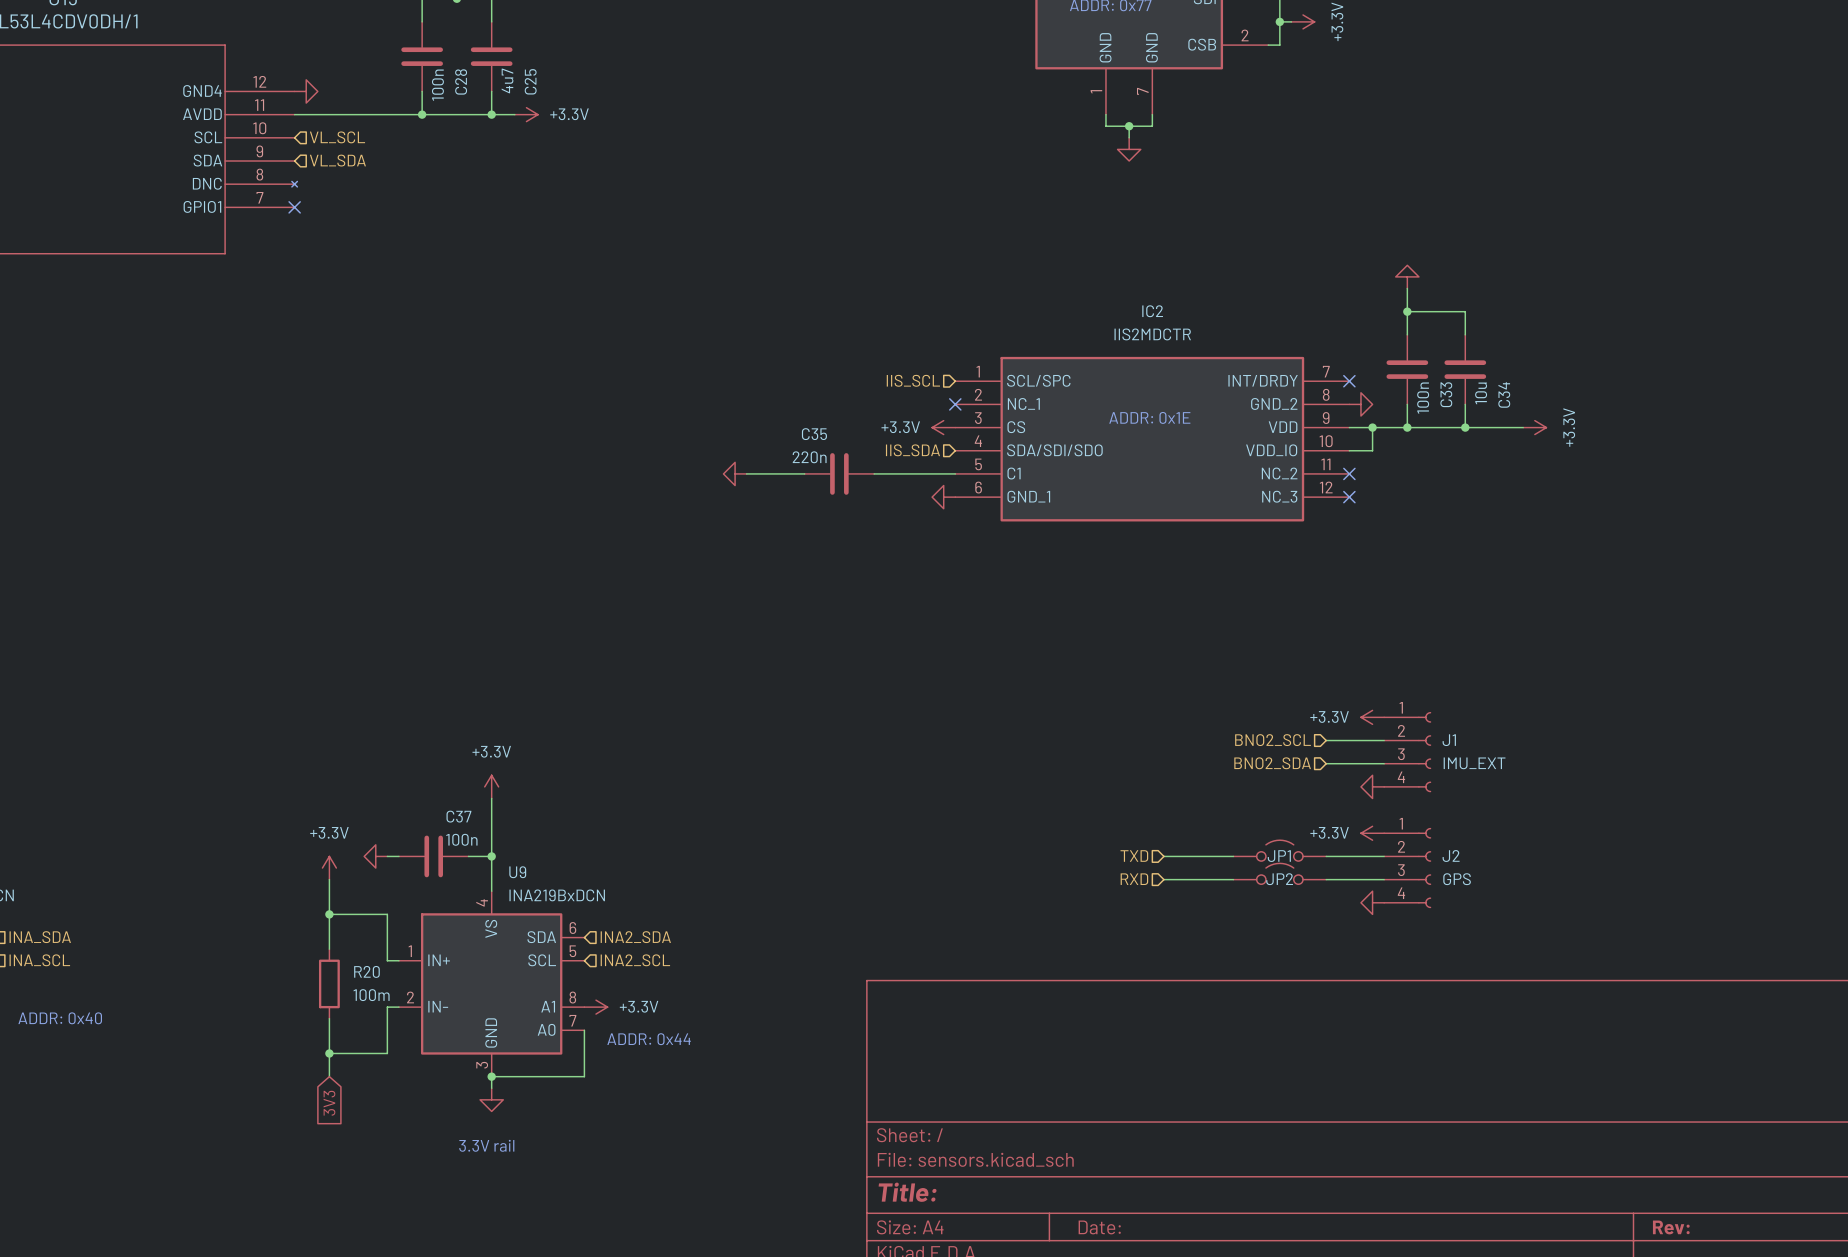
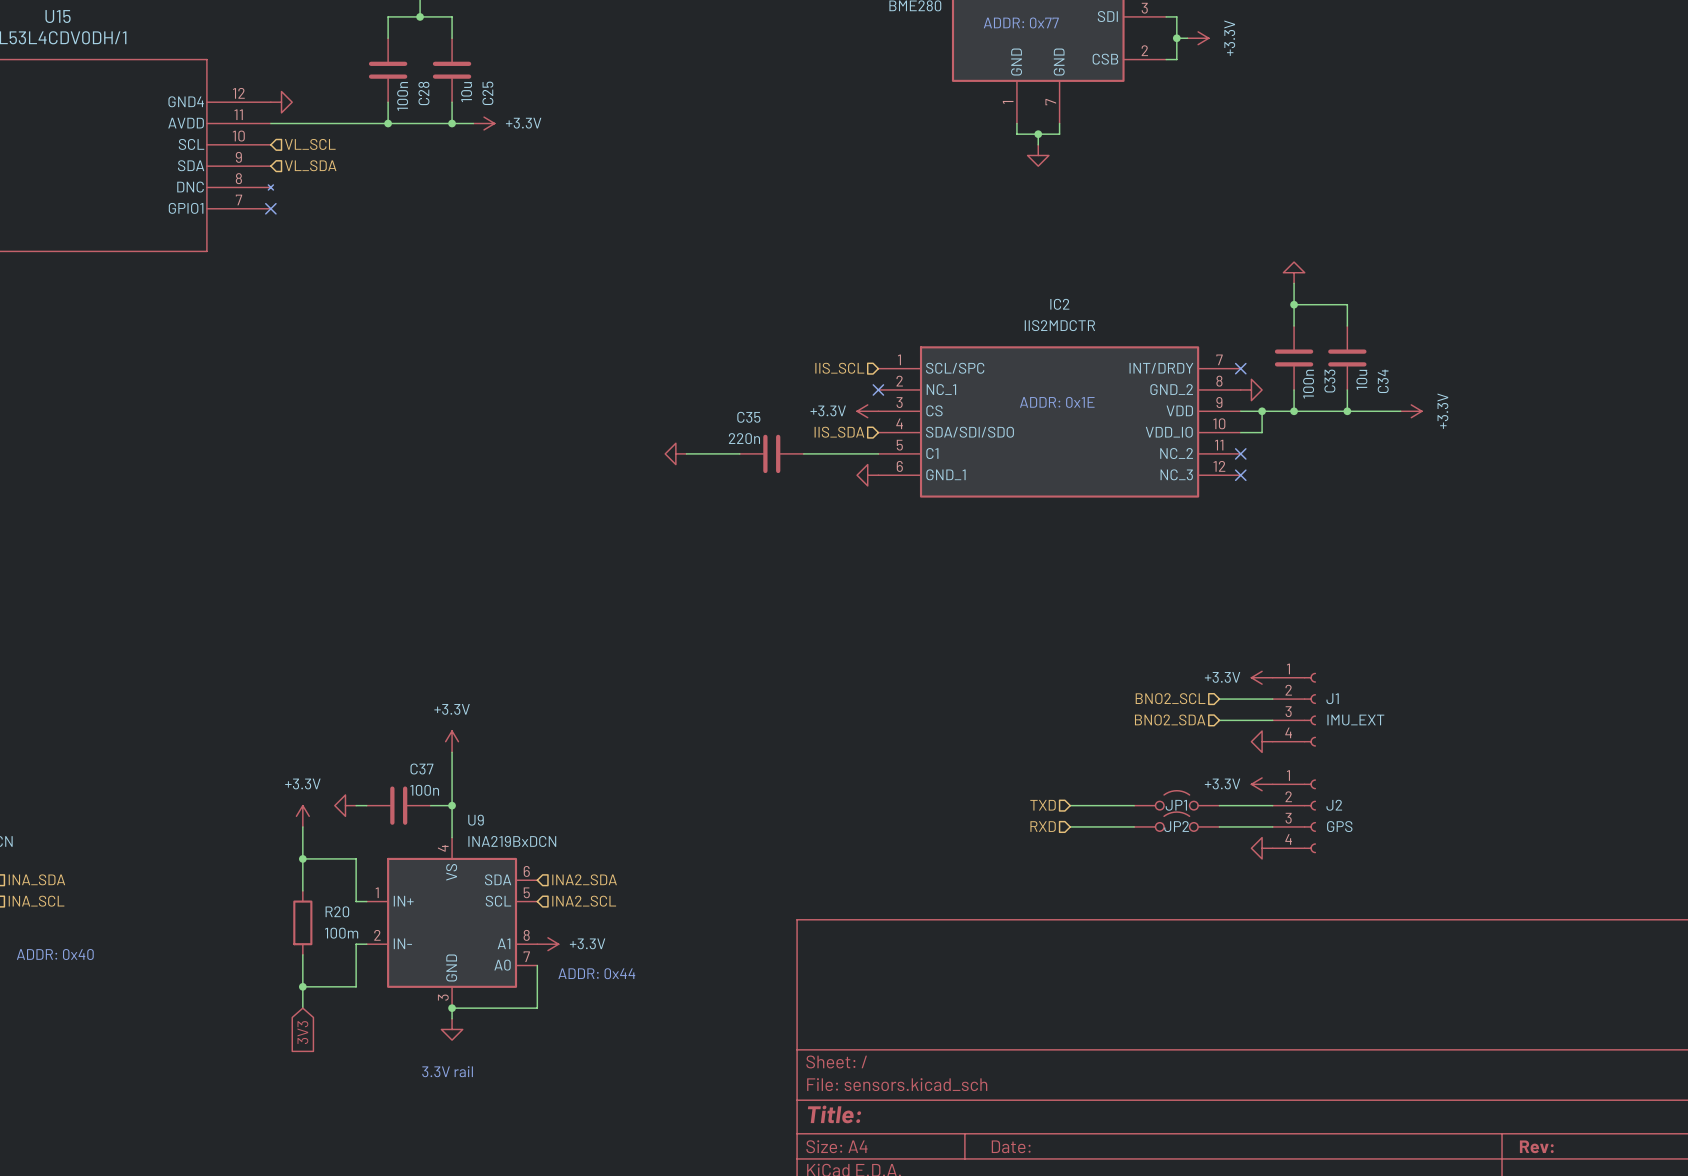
C25 value: 4u7 (507, 80) -> 10u (466, 92)

